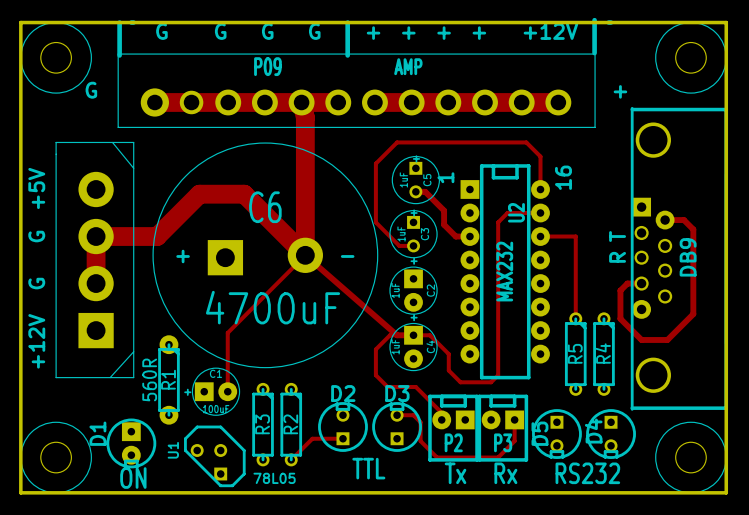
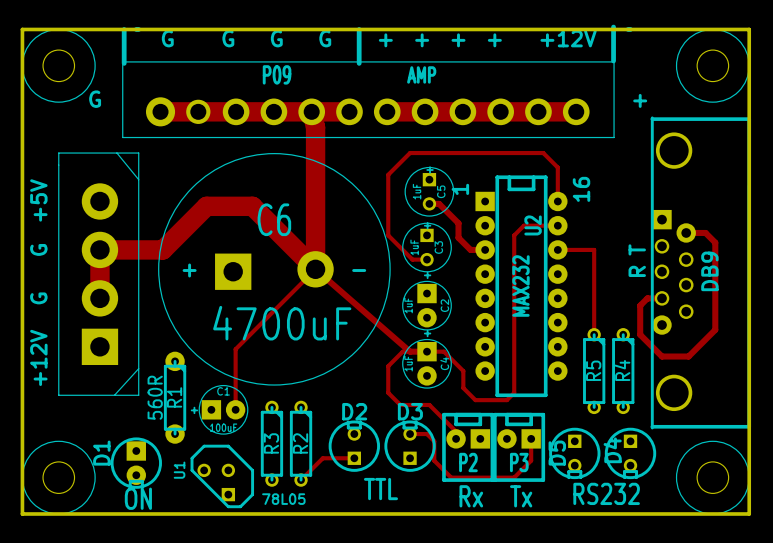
text position: Tx (455, 473) -> Tx (521, 496)
text position: Rx (505, 473) -> Rx (471, 496)

